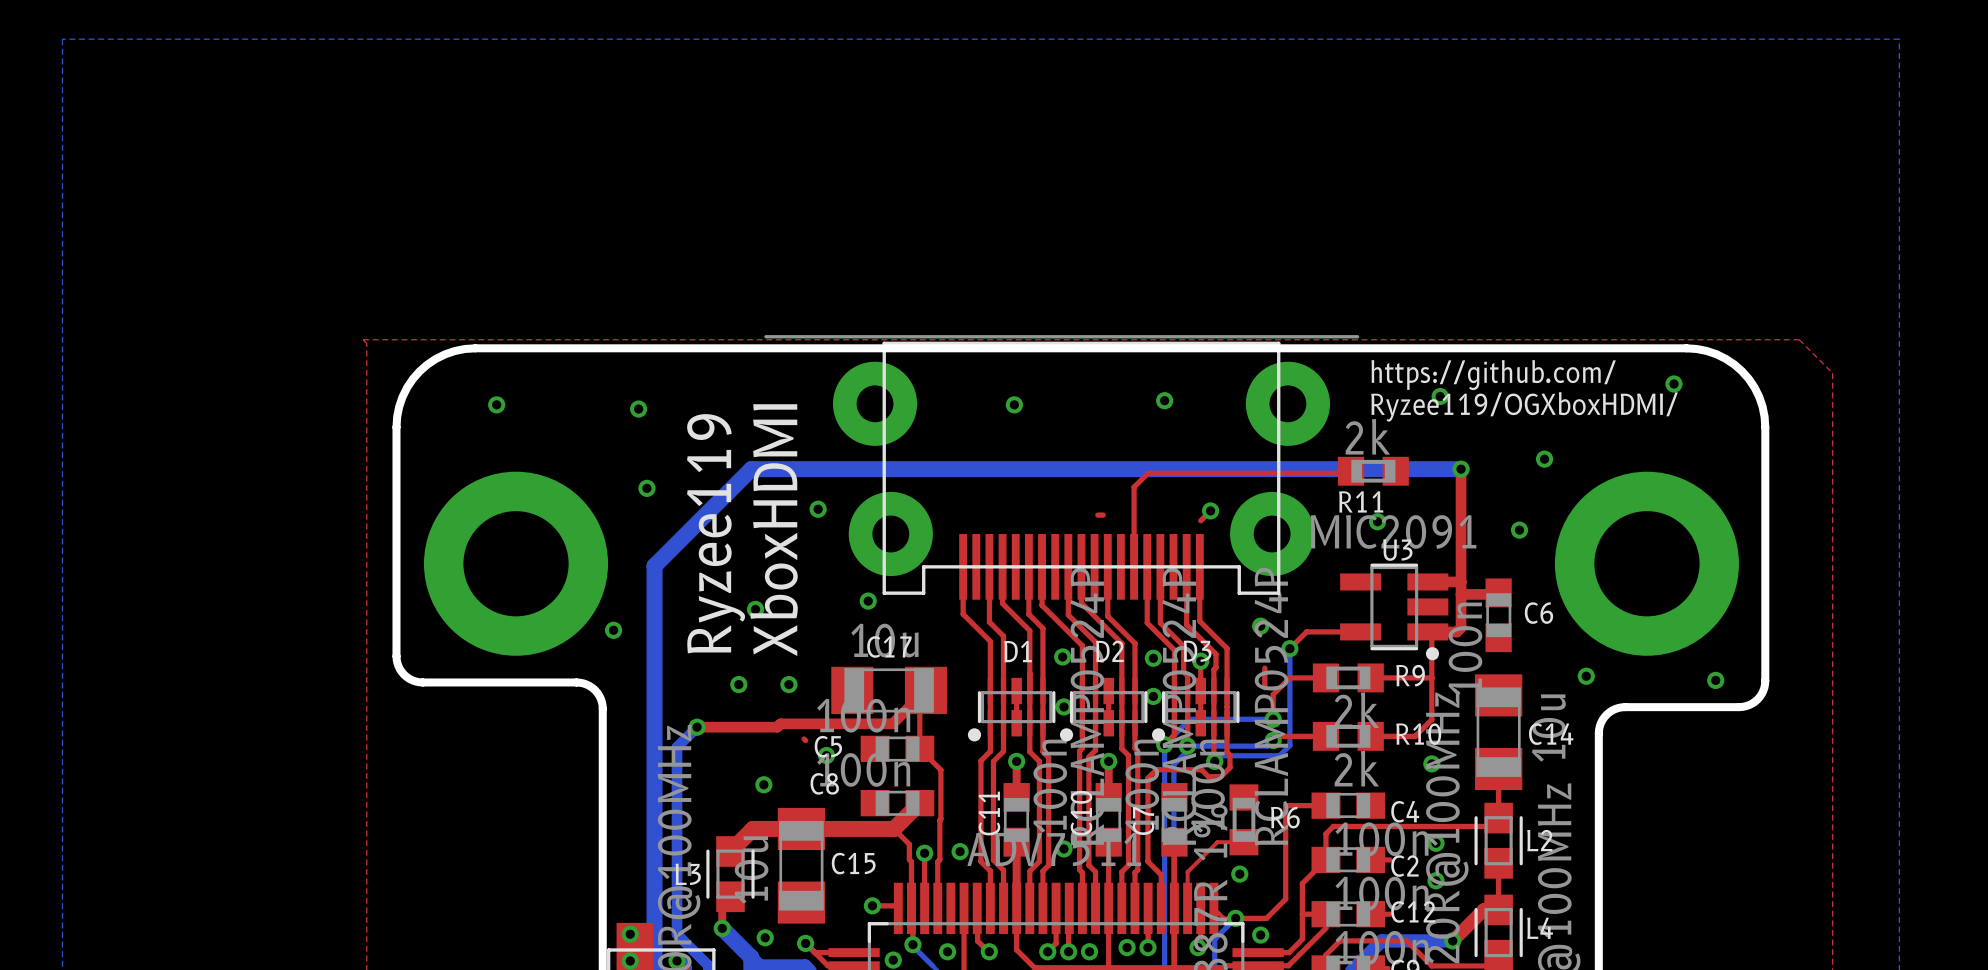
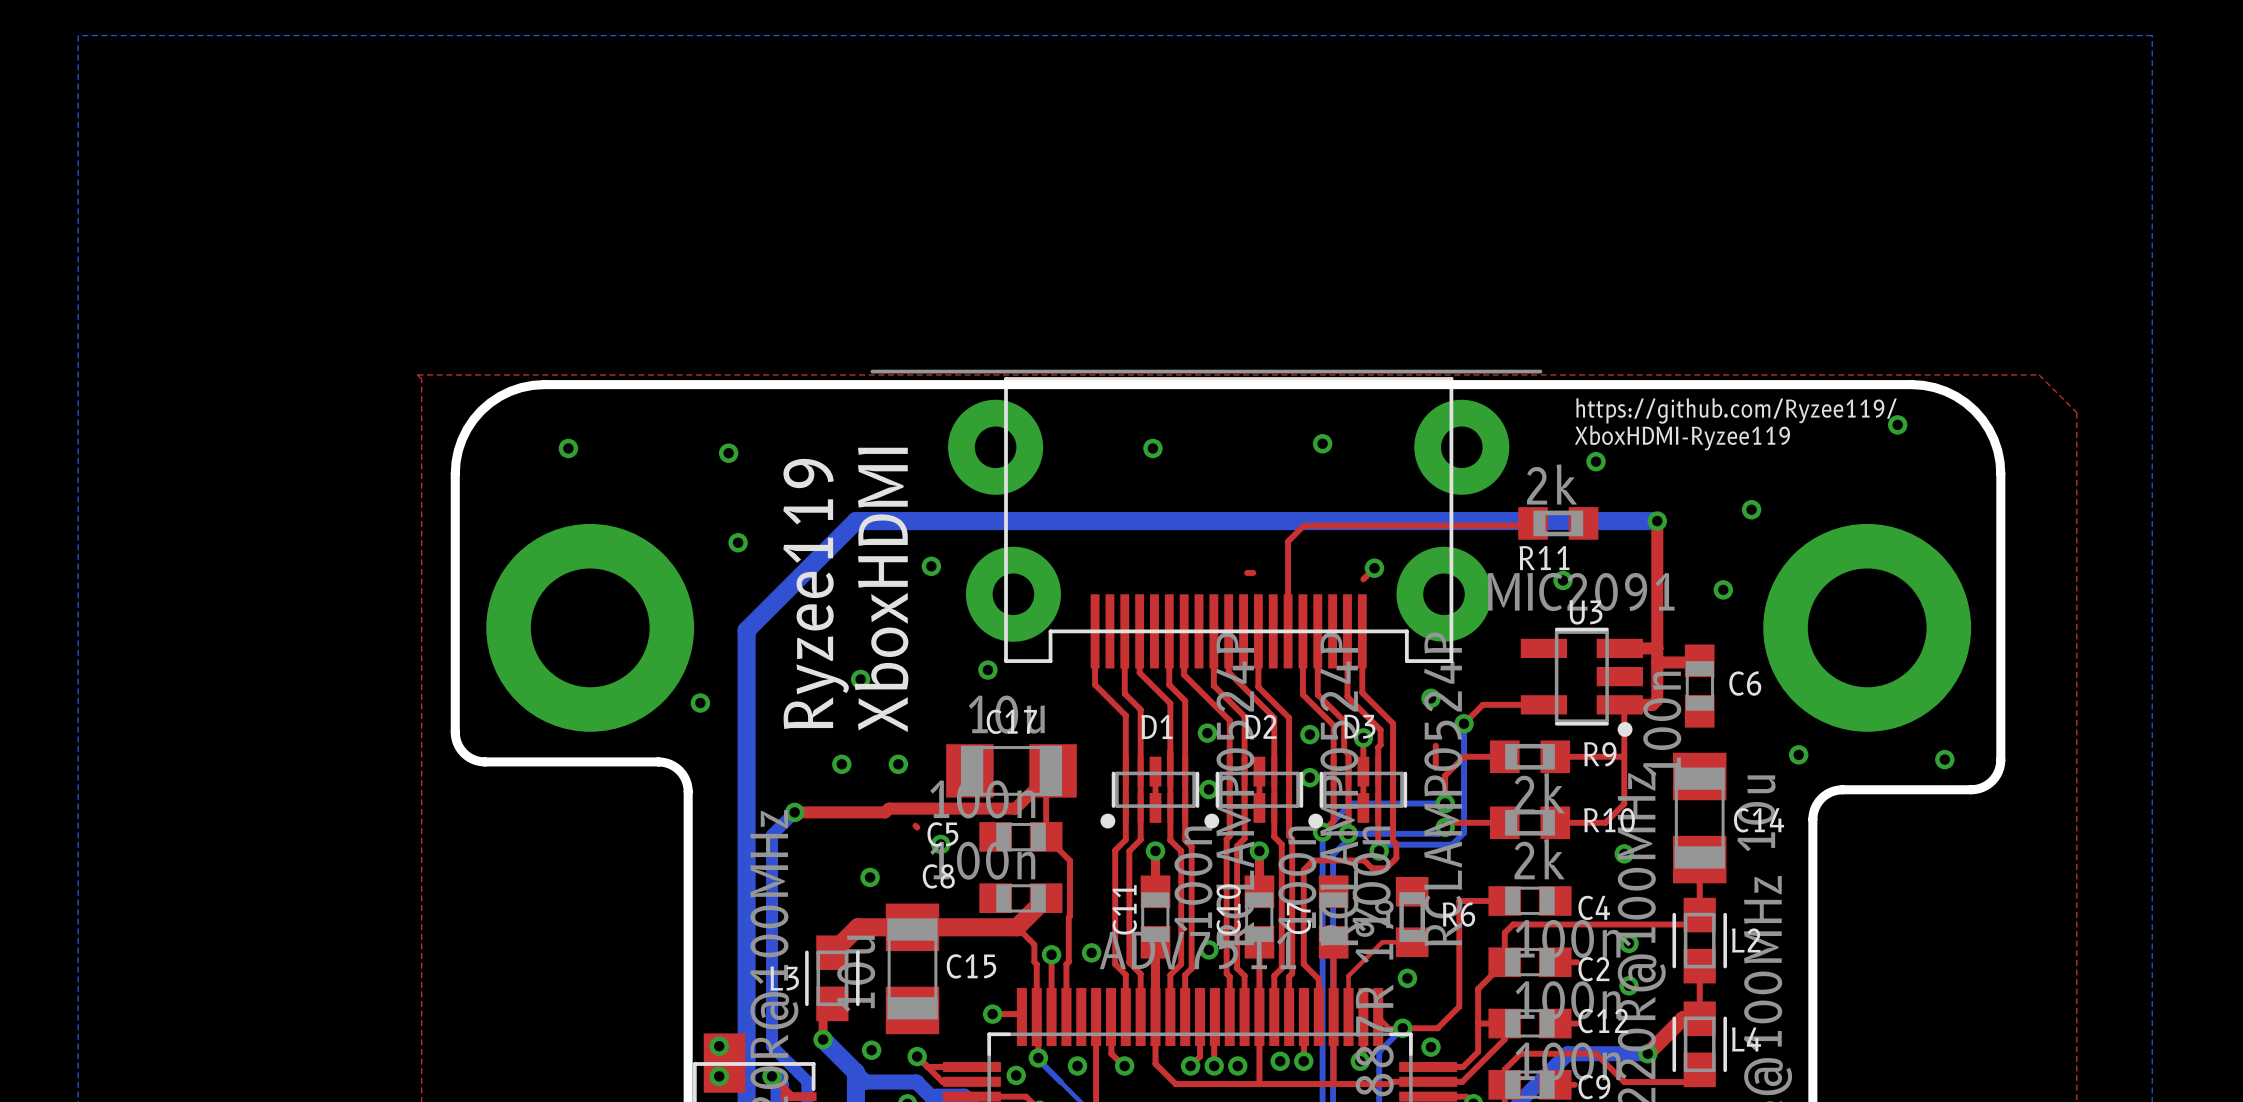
text: https://github.com/ (1493, 375) -> https://github.com/Ryzee119/ (1736, 410)
text: none -> XboxHDMI-Ryzee119 (1682, 437)
via position: (1440, 396) -> (1596, 461)
text: Ryzee119/OGXboxHDMI/ (1524, 406) -> none

